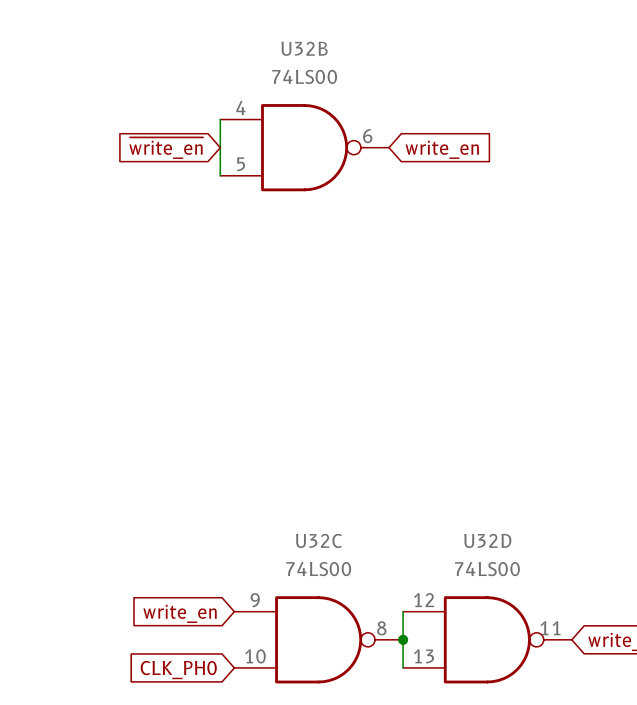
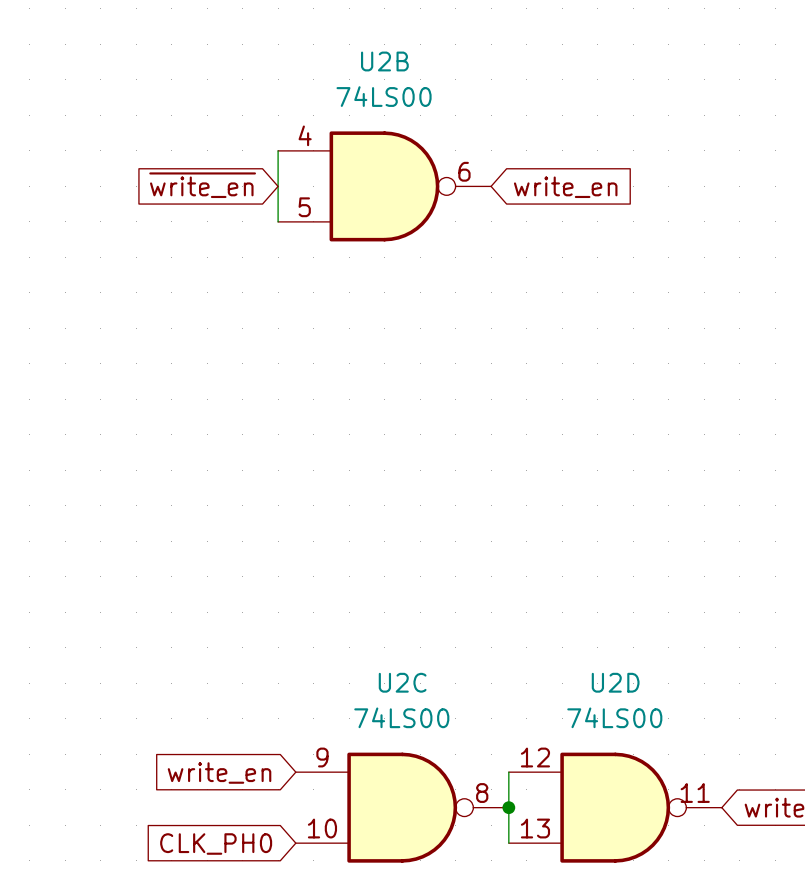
U32B name: U32B (304, 48) -> U2B (384, 61)
U32C name: U32C (318, 540) -> U2C (402, 682)
U32D name: U32D (487, 540) -> U2D (615, 682)

